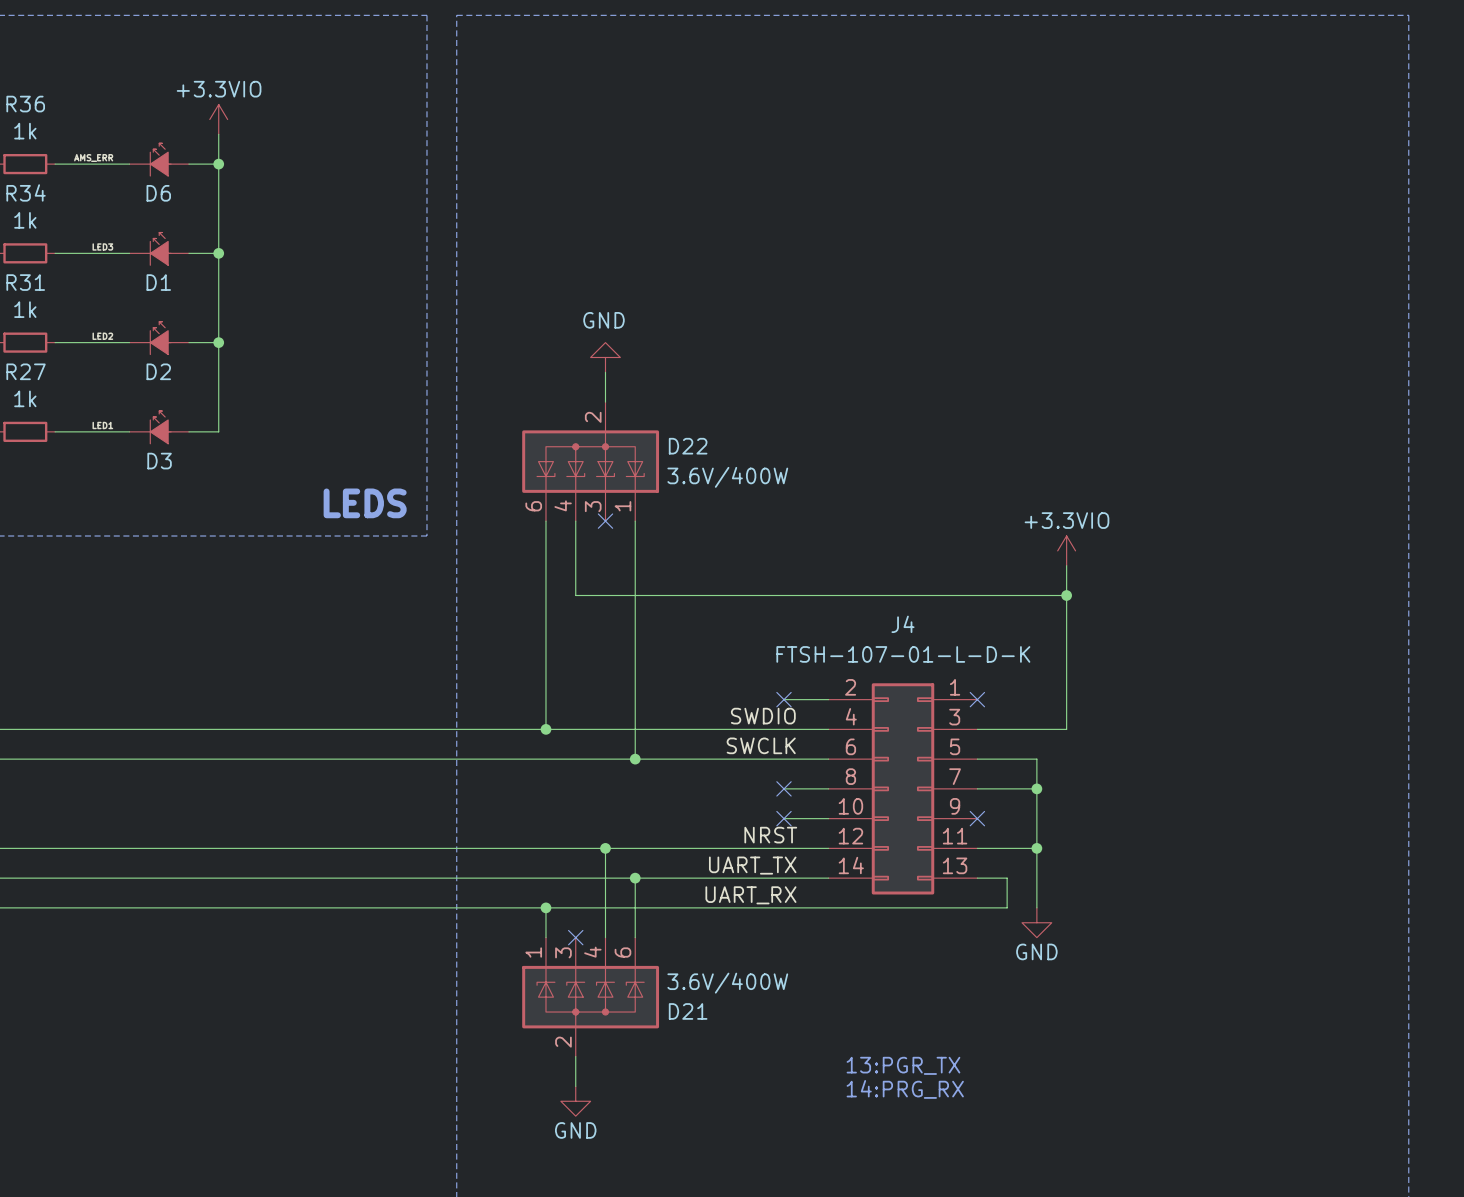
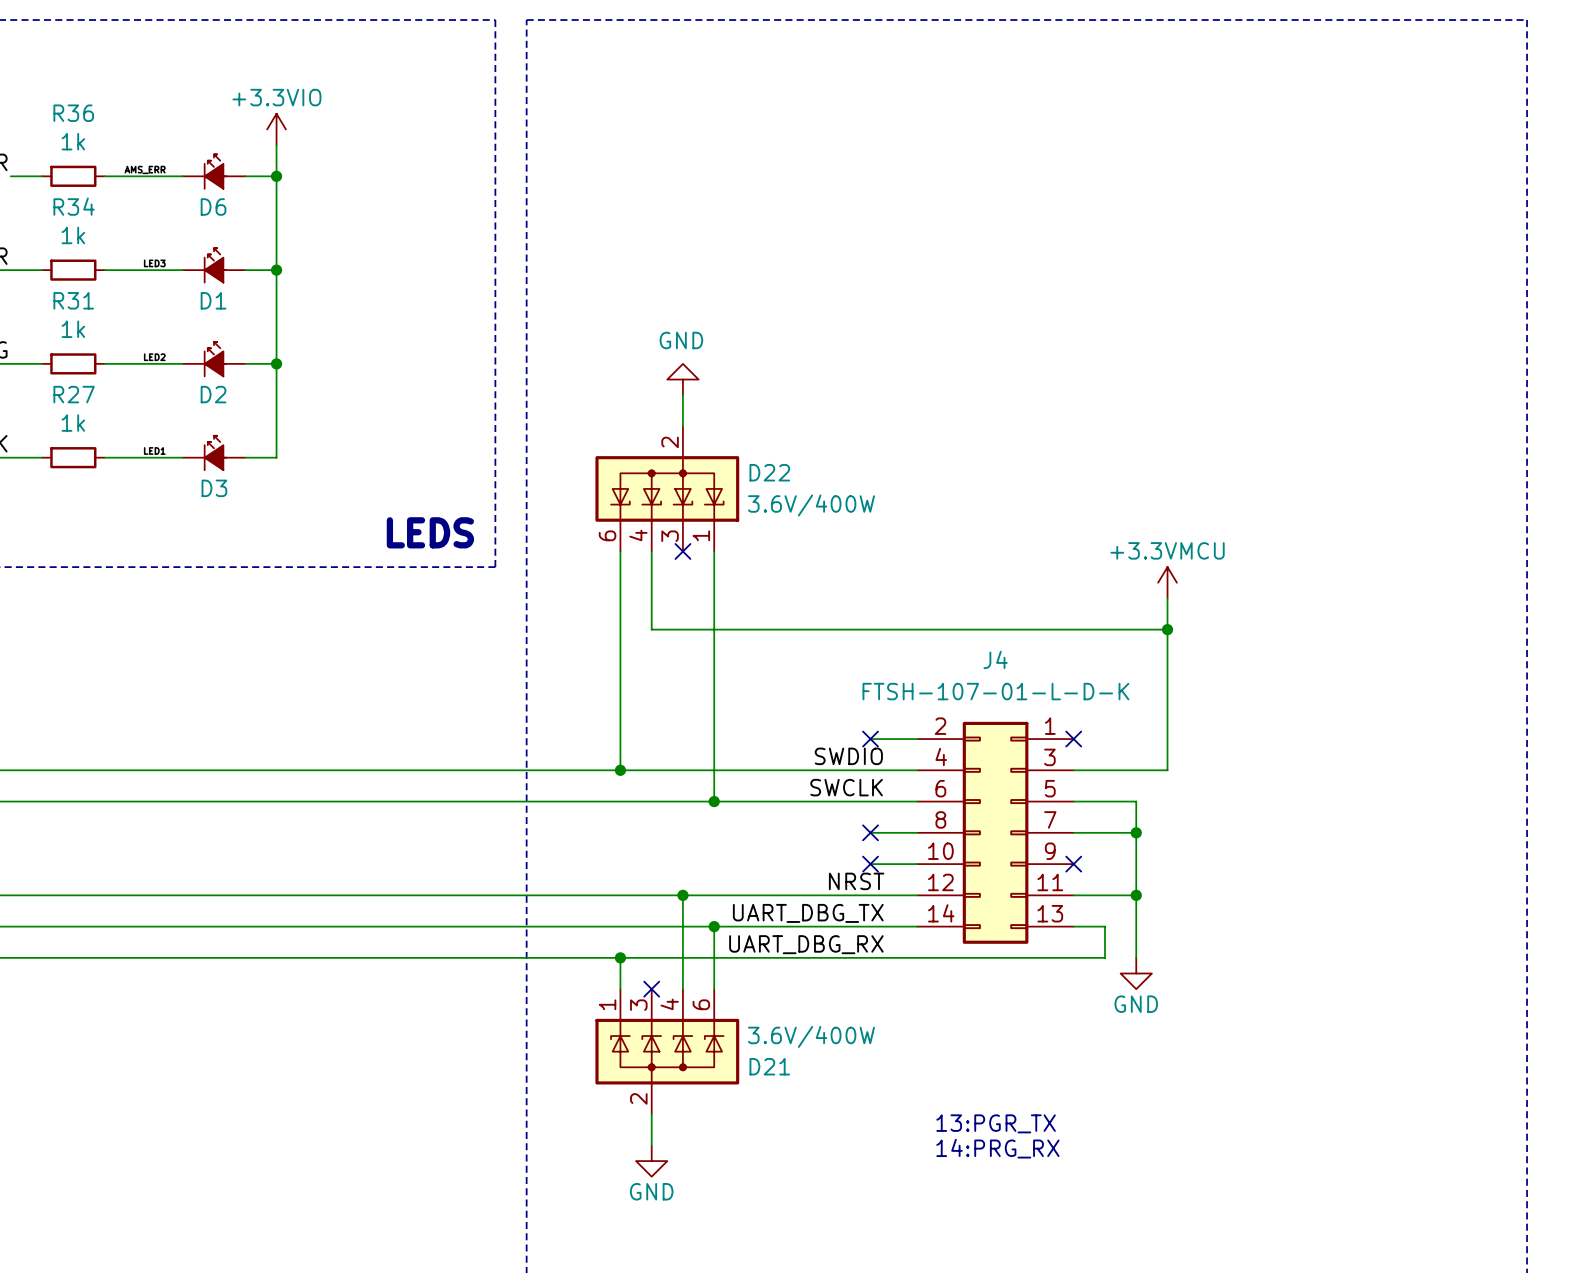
power symbol: +3.3VIO (1066, 550) -> +3.3VMCU (1167, 582)
label: UART_TX (752, 865) -> UART_DBG_TX (808, 913)
label: UART_RX (750, 895) -> UART_DBG_RX (806, 944)

